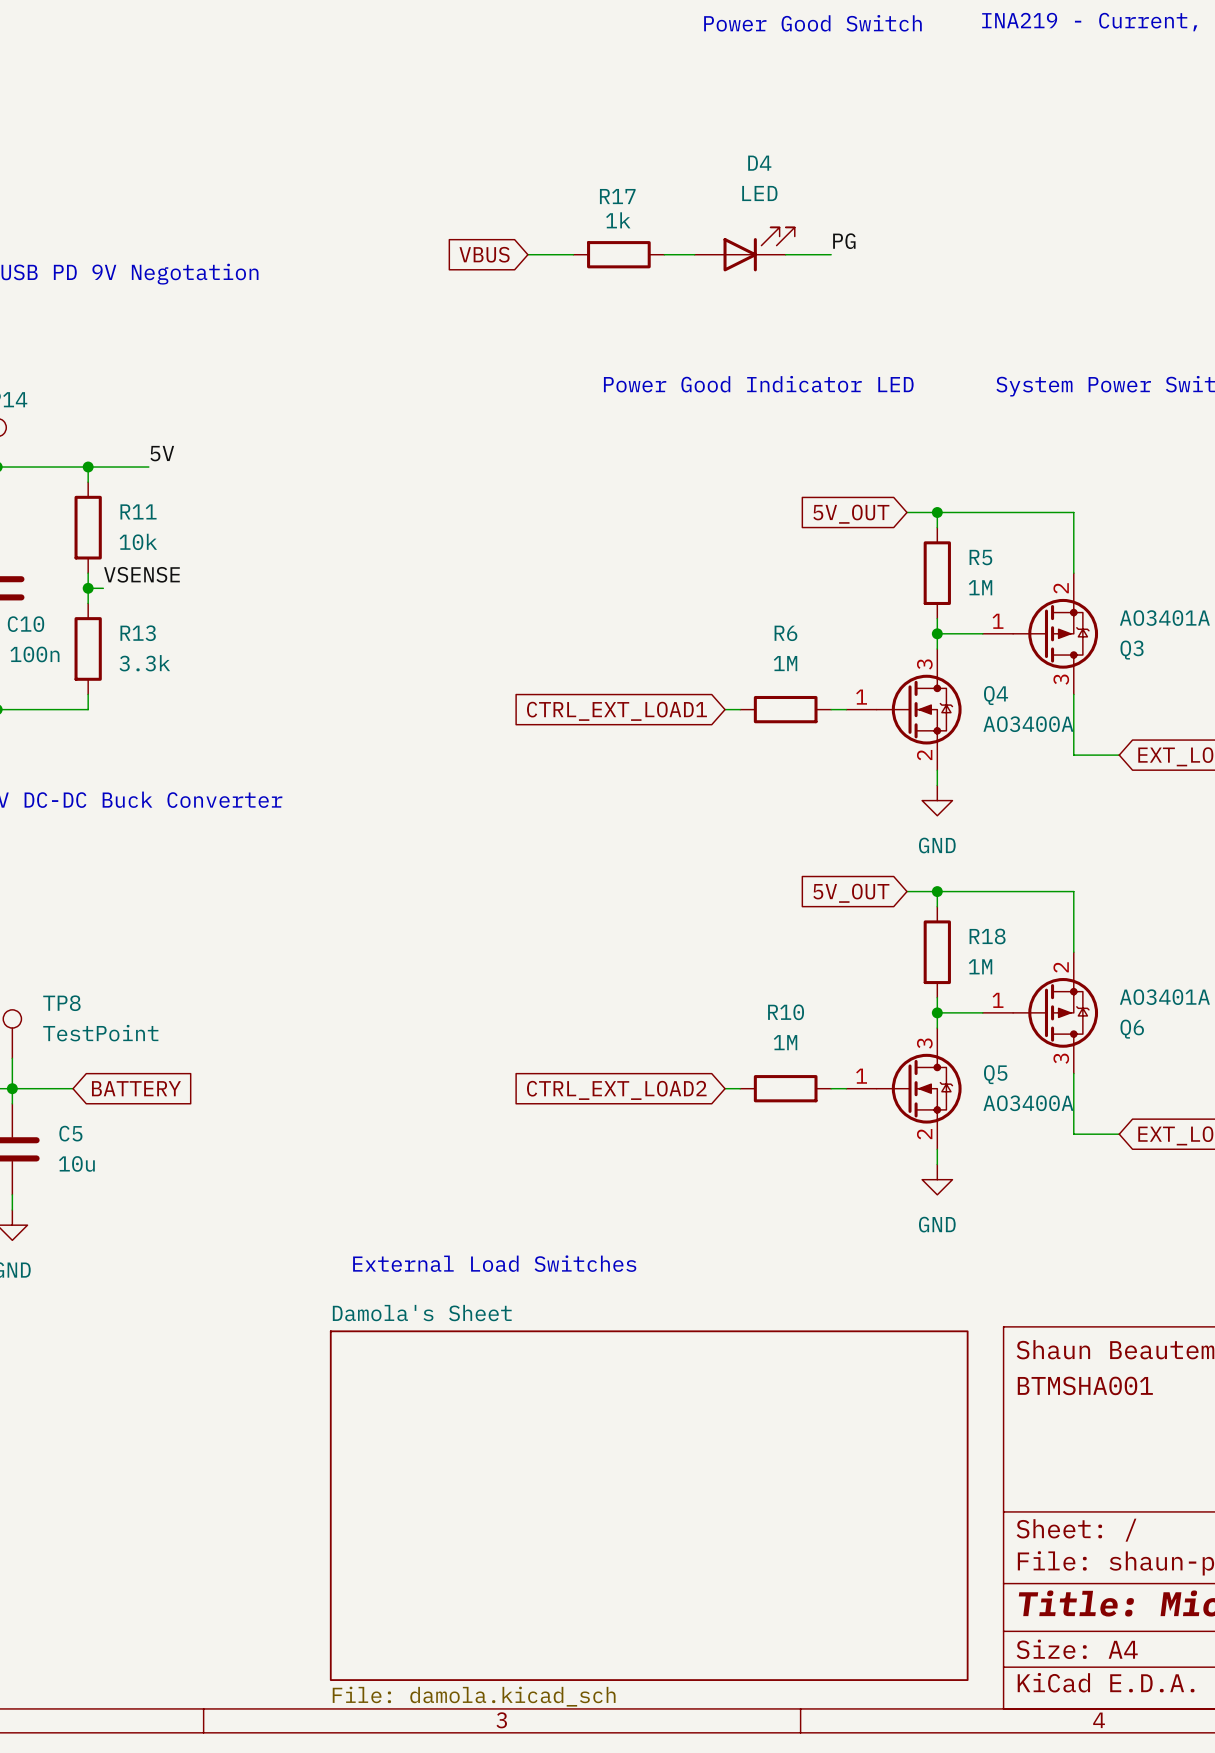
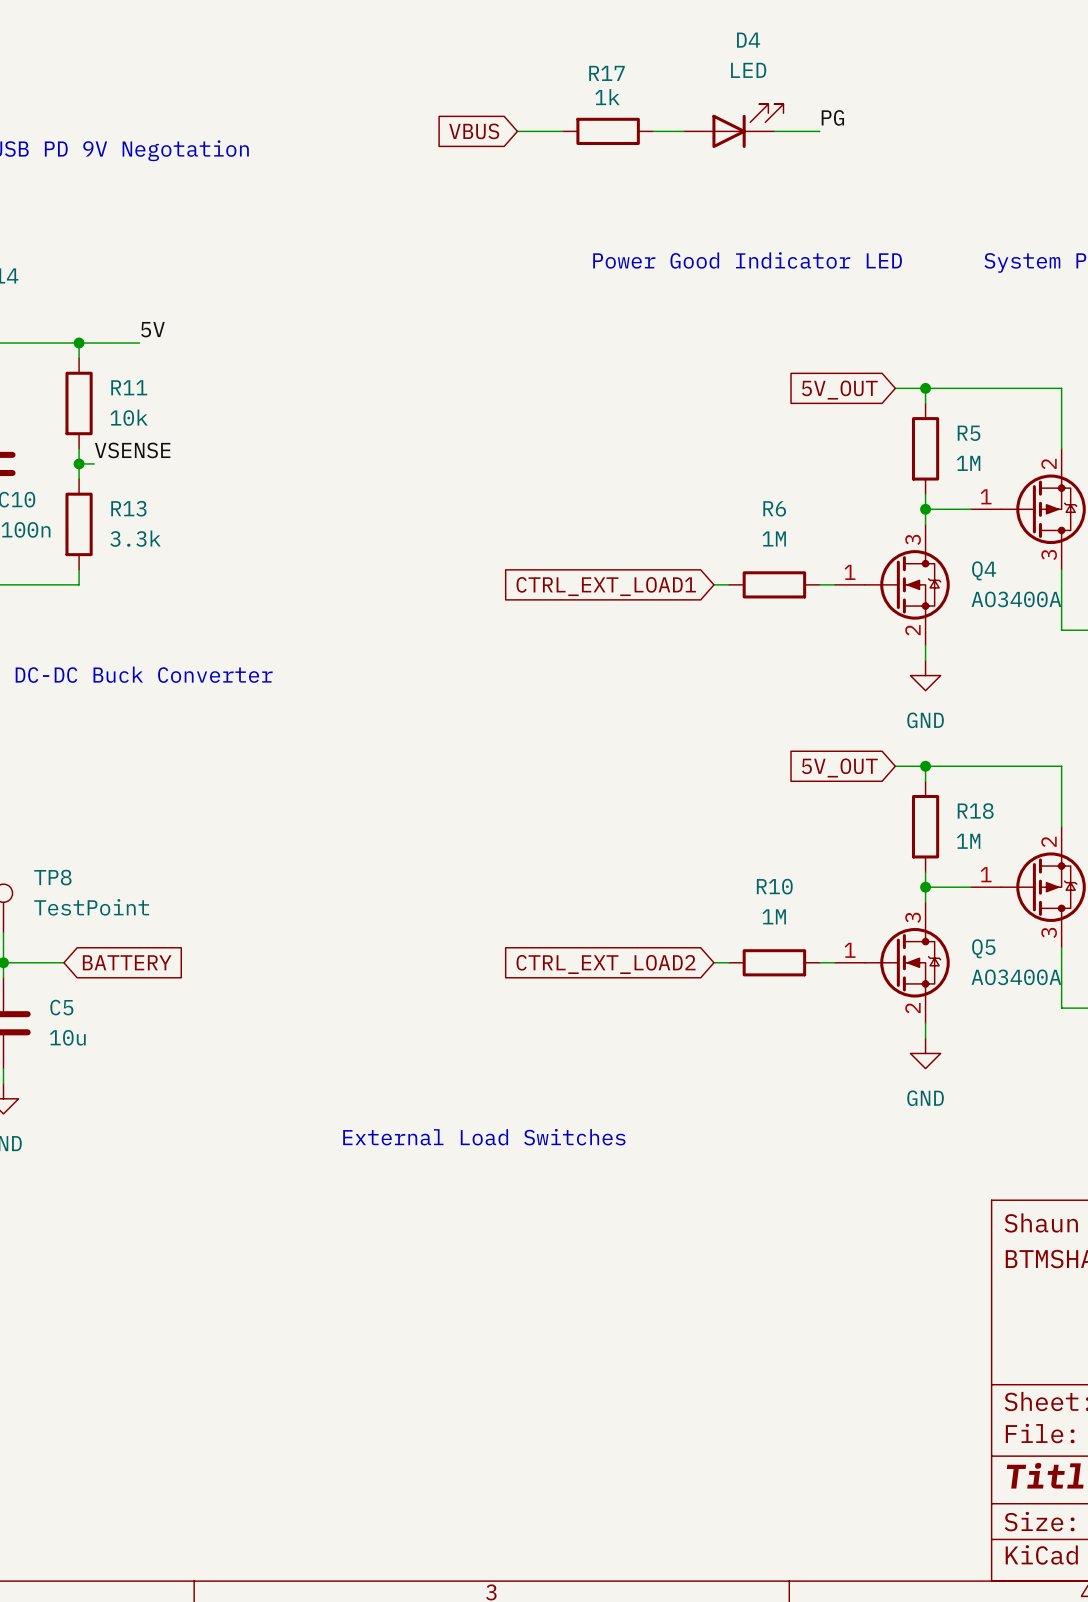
sheet Damola's Sheet: File: damola.kicad_sch (649, 1505) -> none

